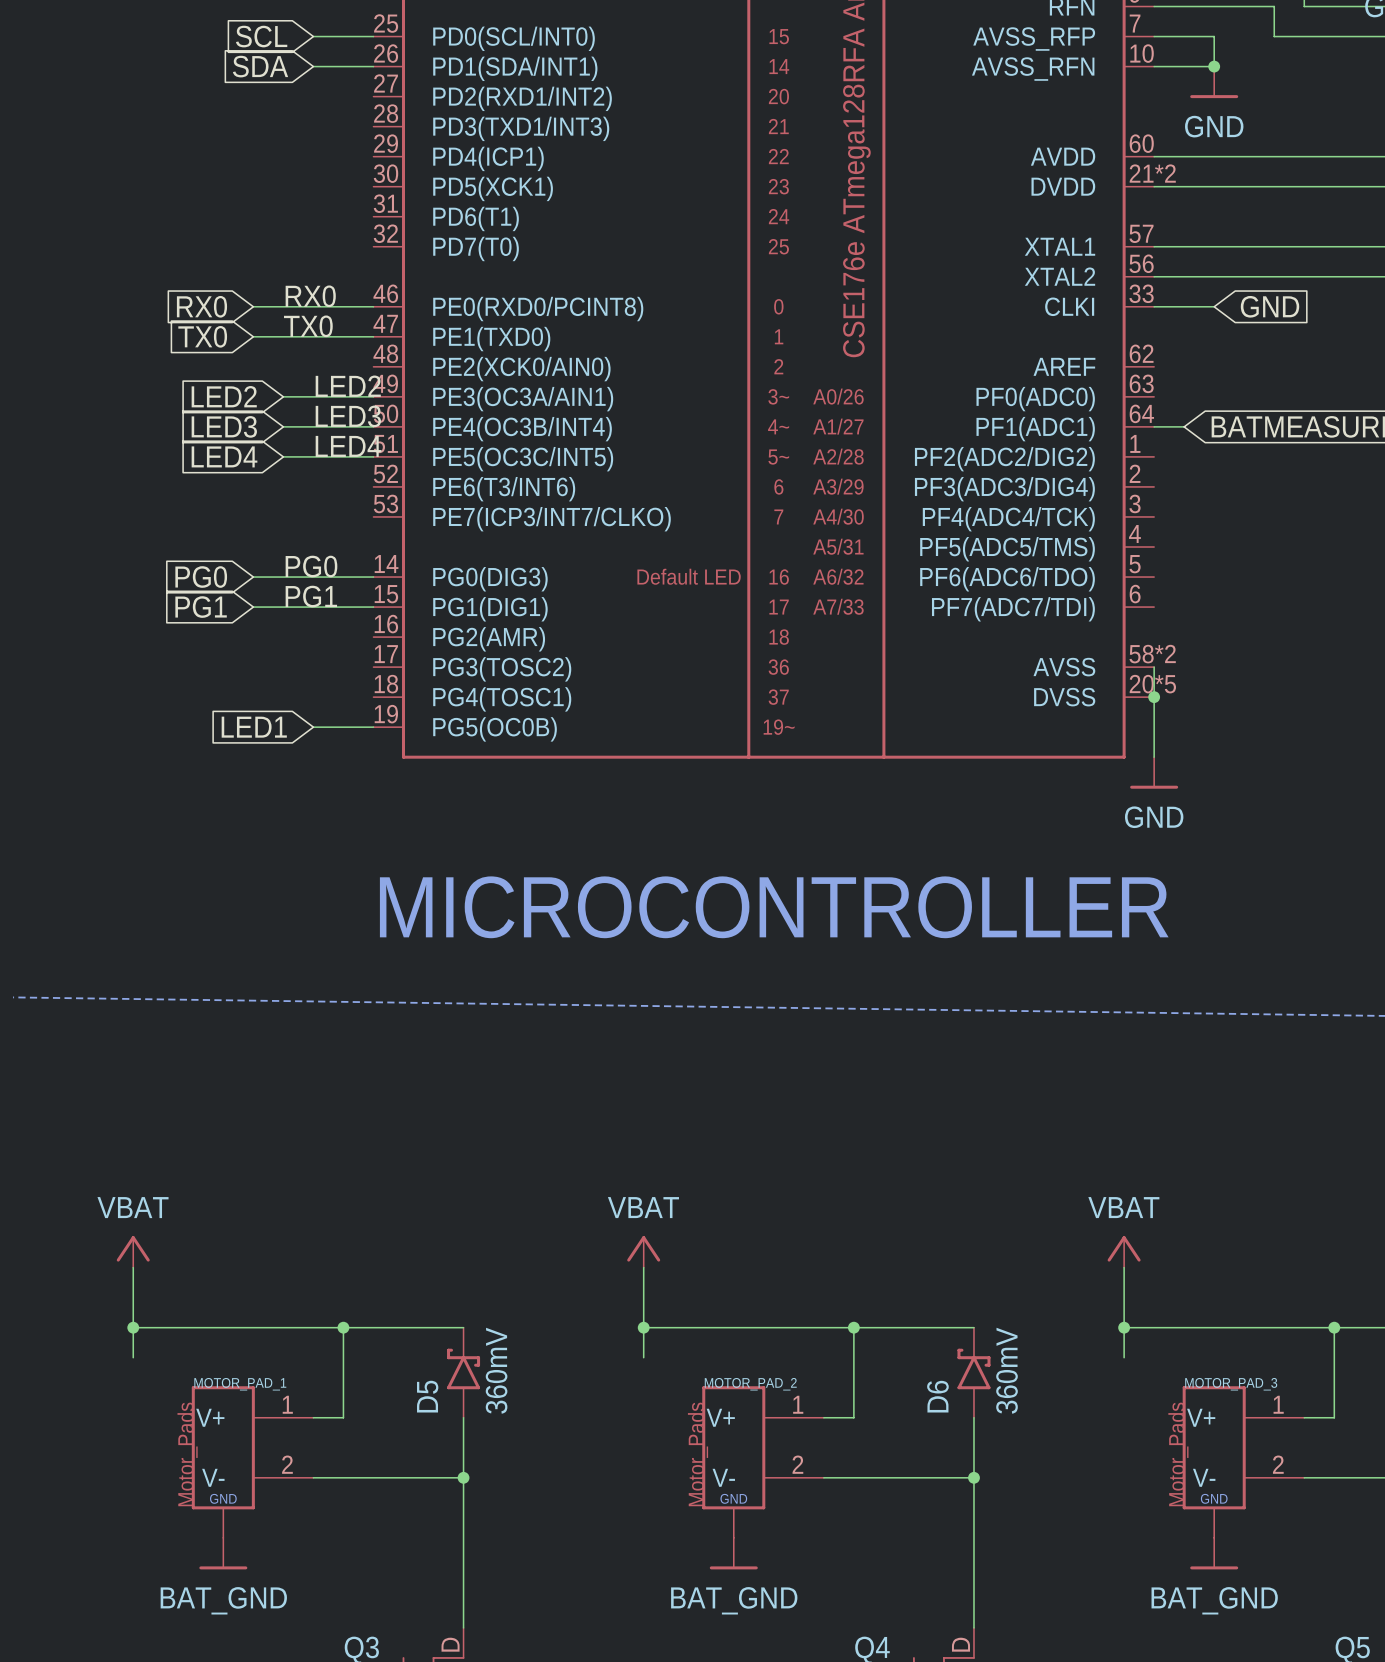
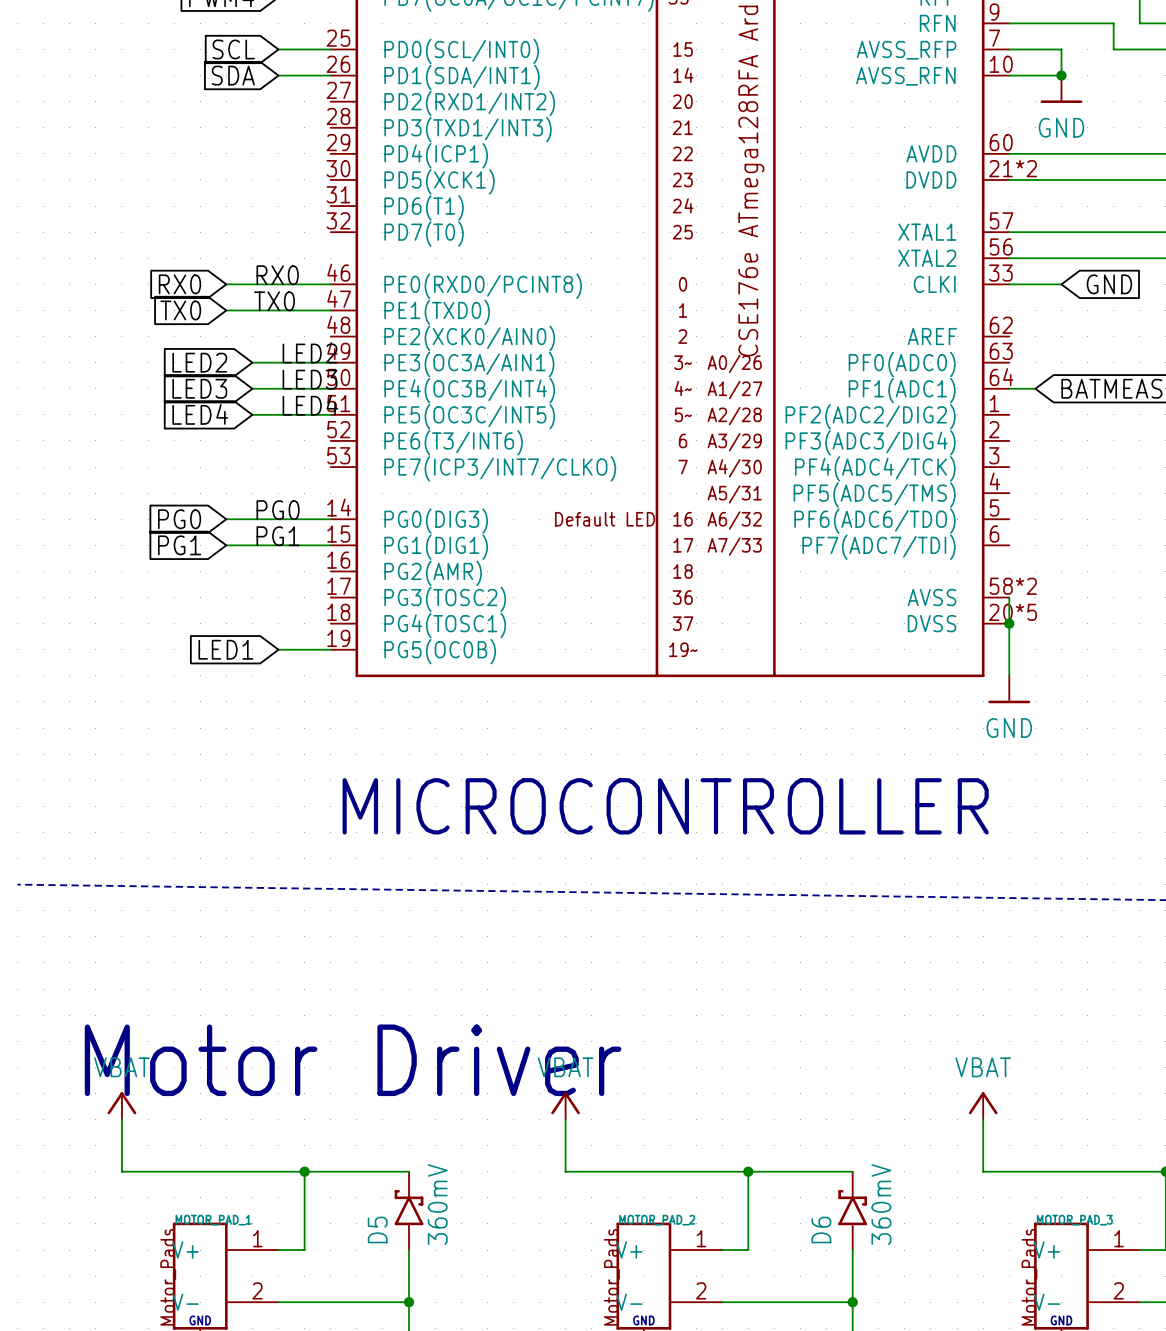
text: none -> Motor Driver (353, 1060)
wire: (133, 1327) (133, 1357) -> none
junction: (133, 1327) -> none
wire: (643, 1327) (643, 1357) -> none
junction: (643, 1327) -> none
wire: (1124, 1327) (1124, 1357) -> none
junction: (1124, 1327) -> none

